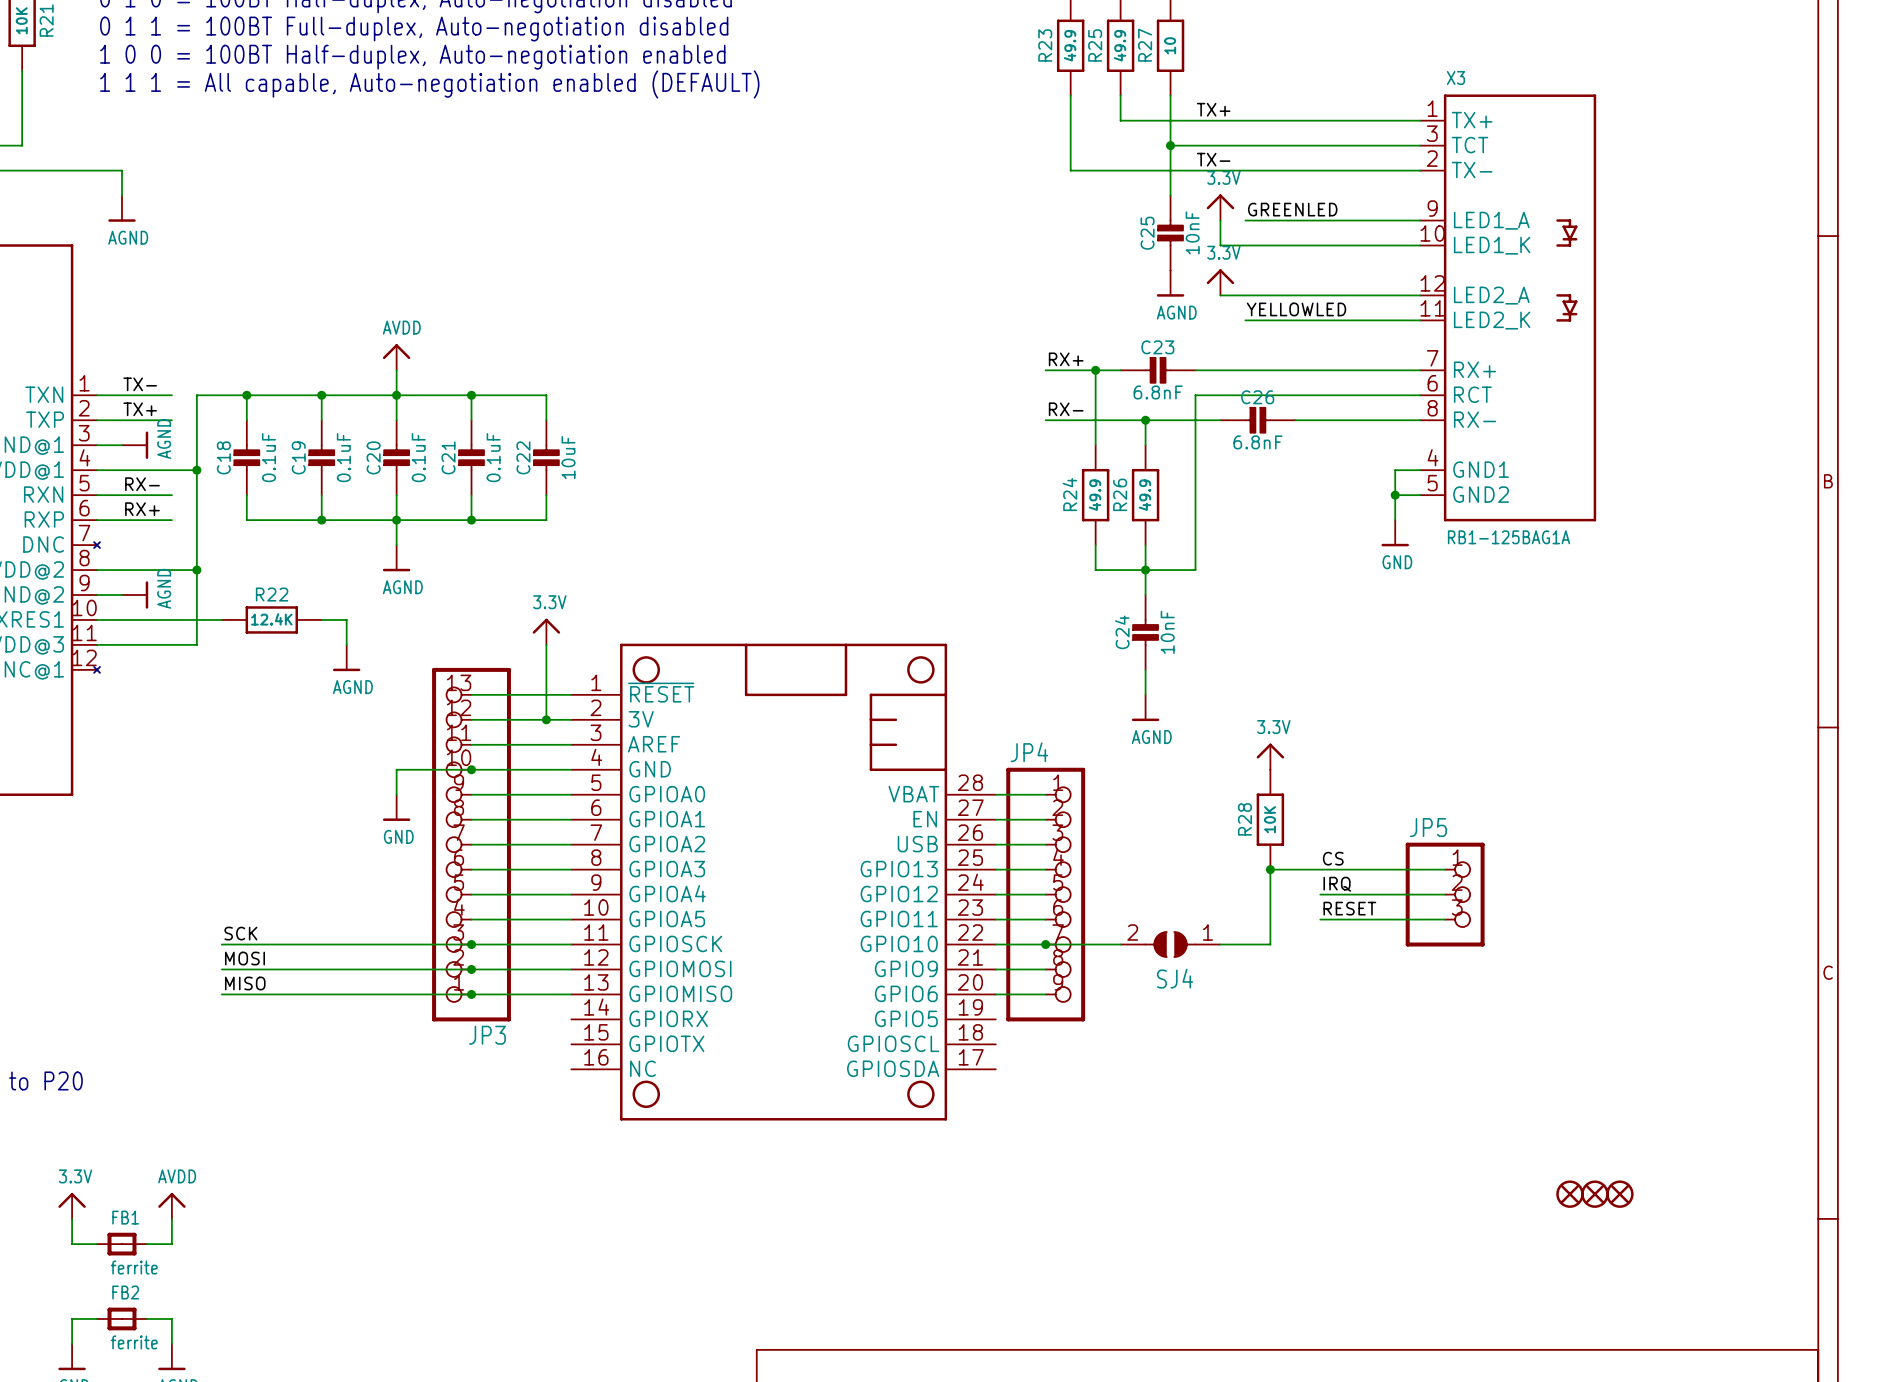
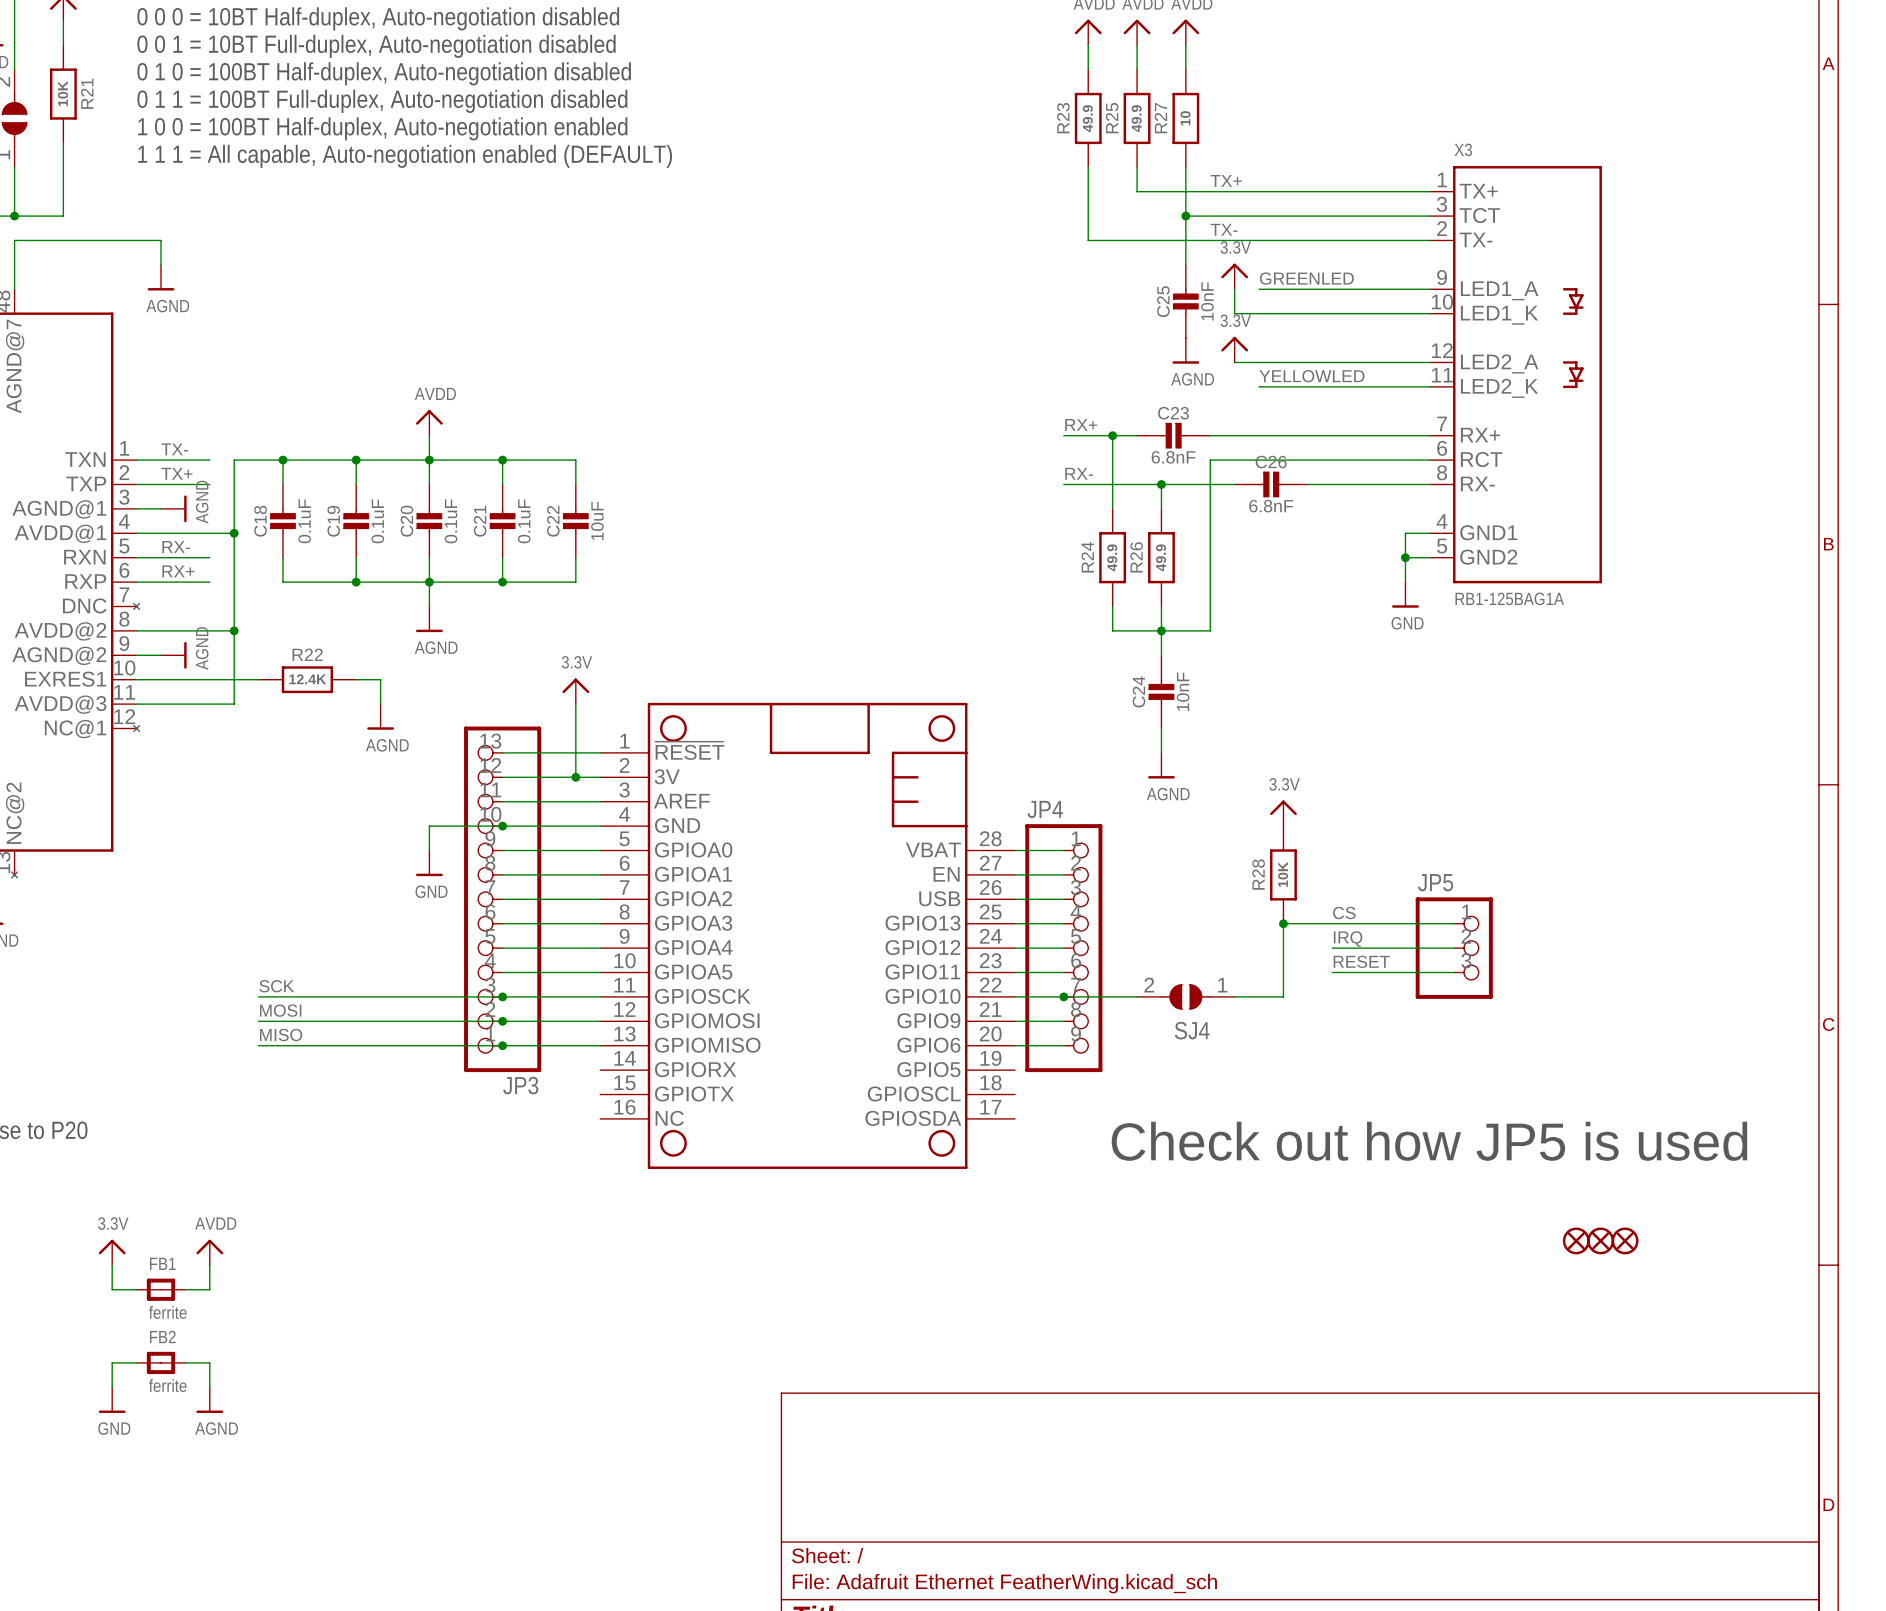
text: none -> Check out how JP5 is used (1429, 1141)

